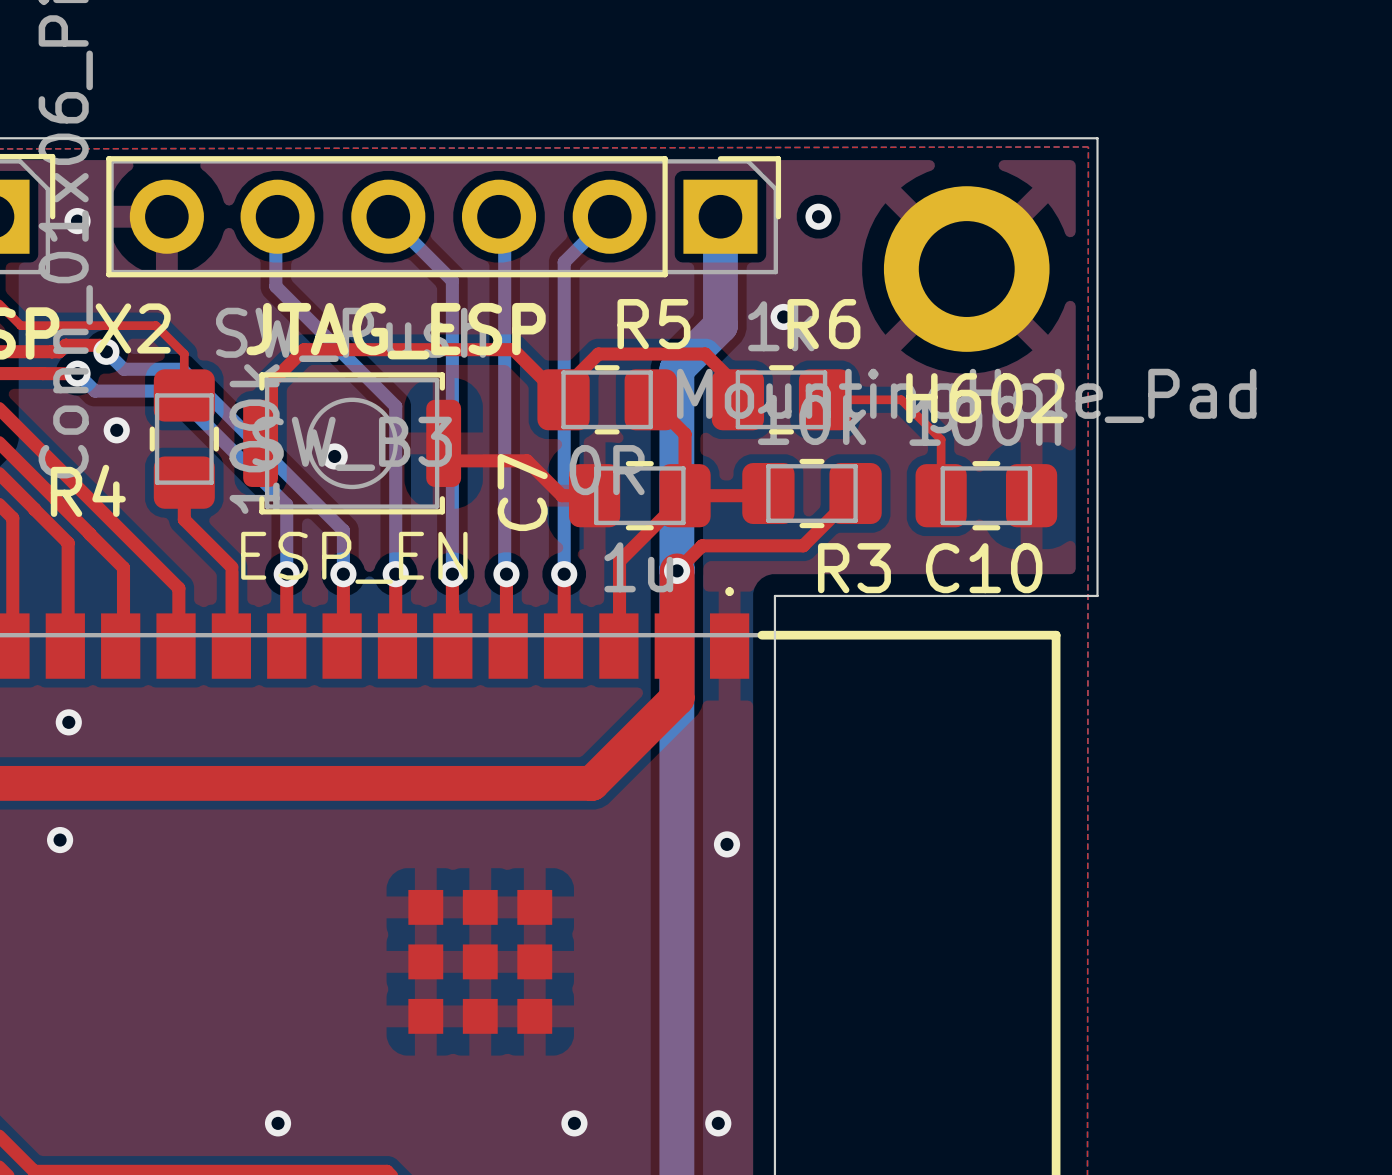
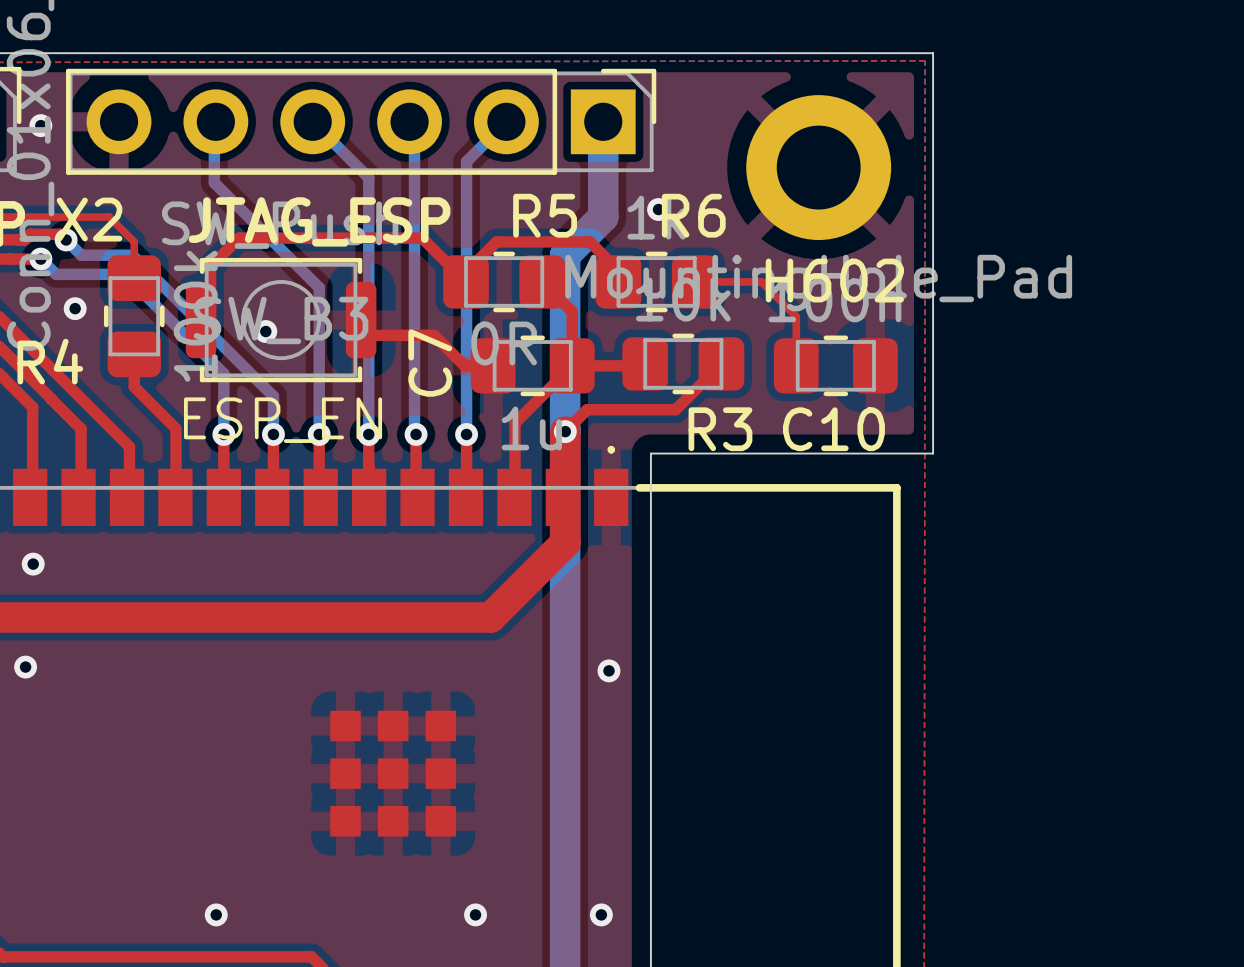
via: (818, 216) -> none

